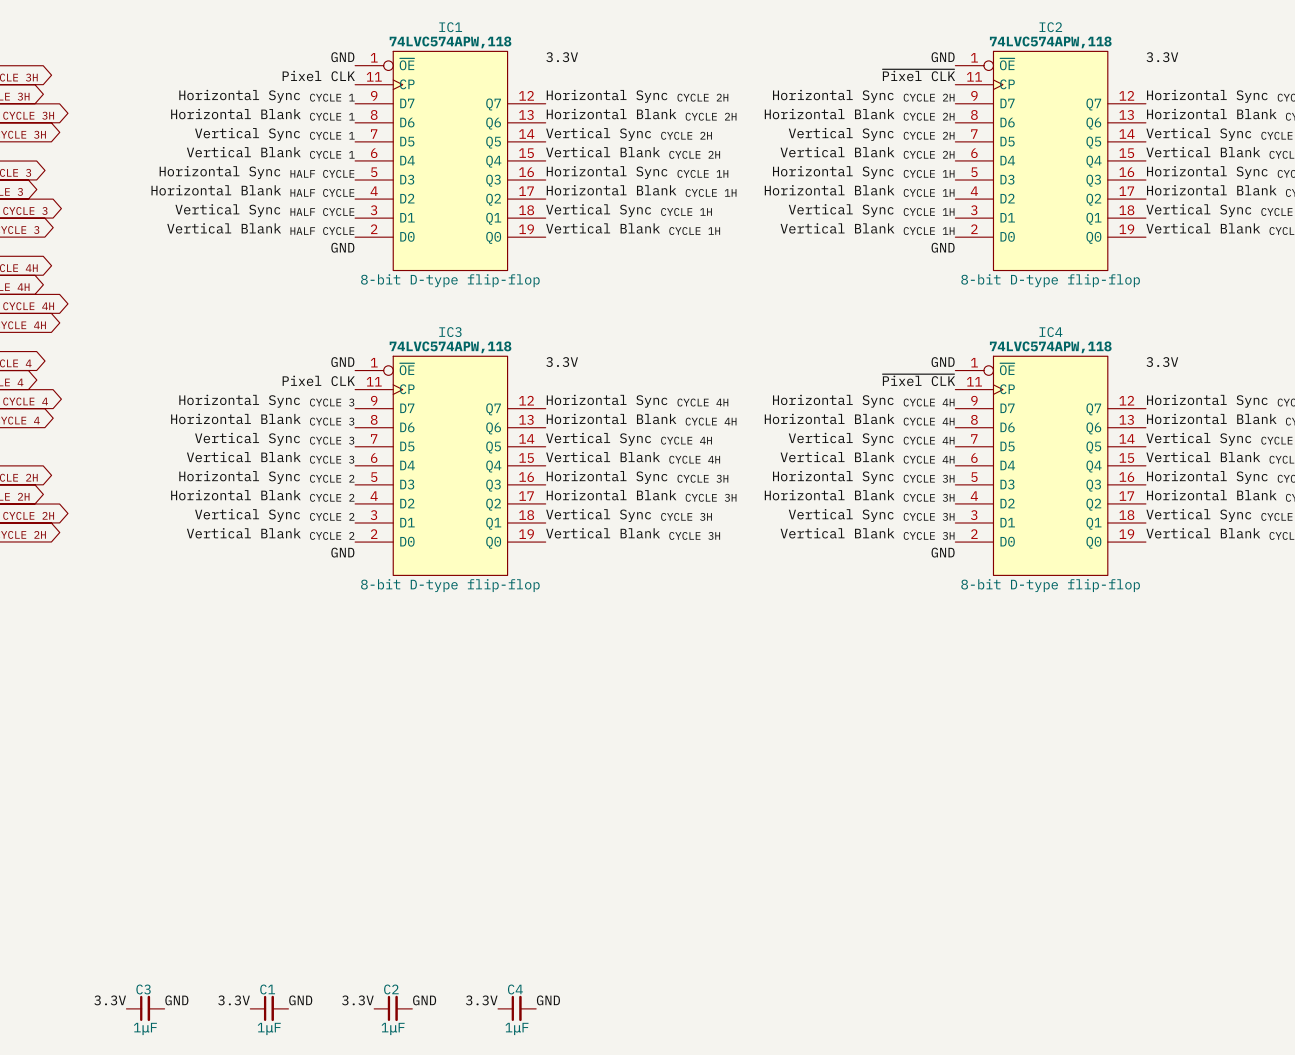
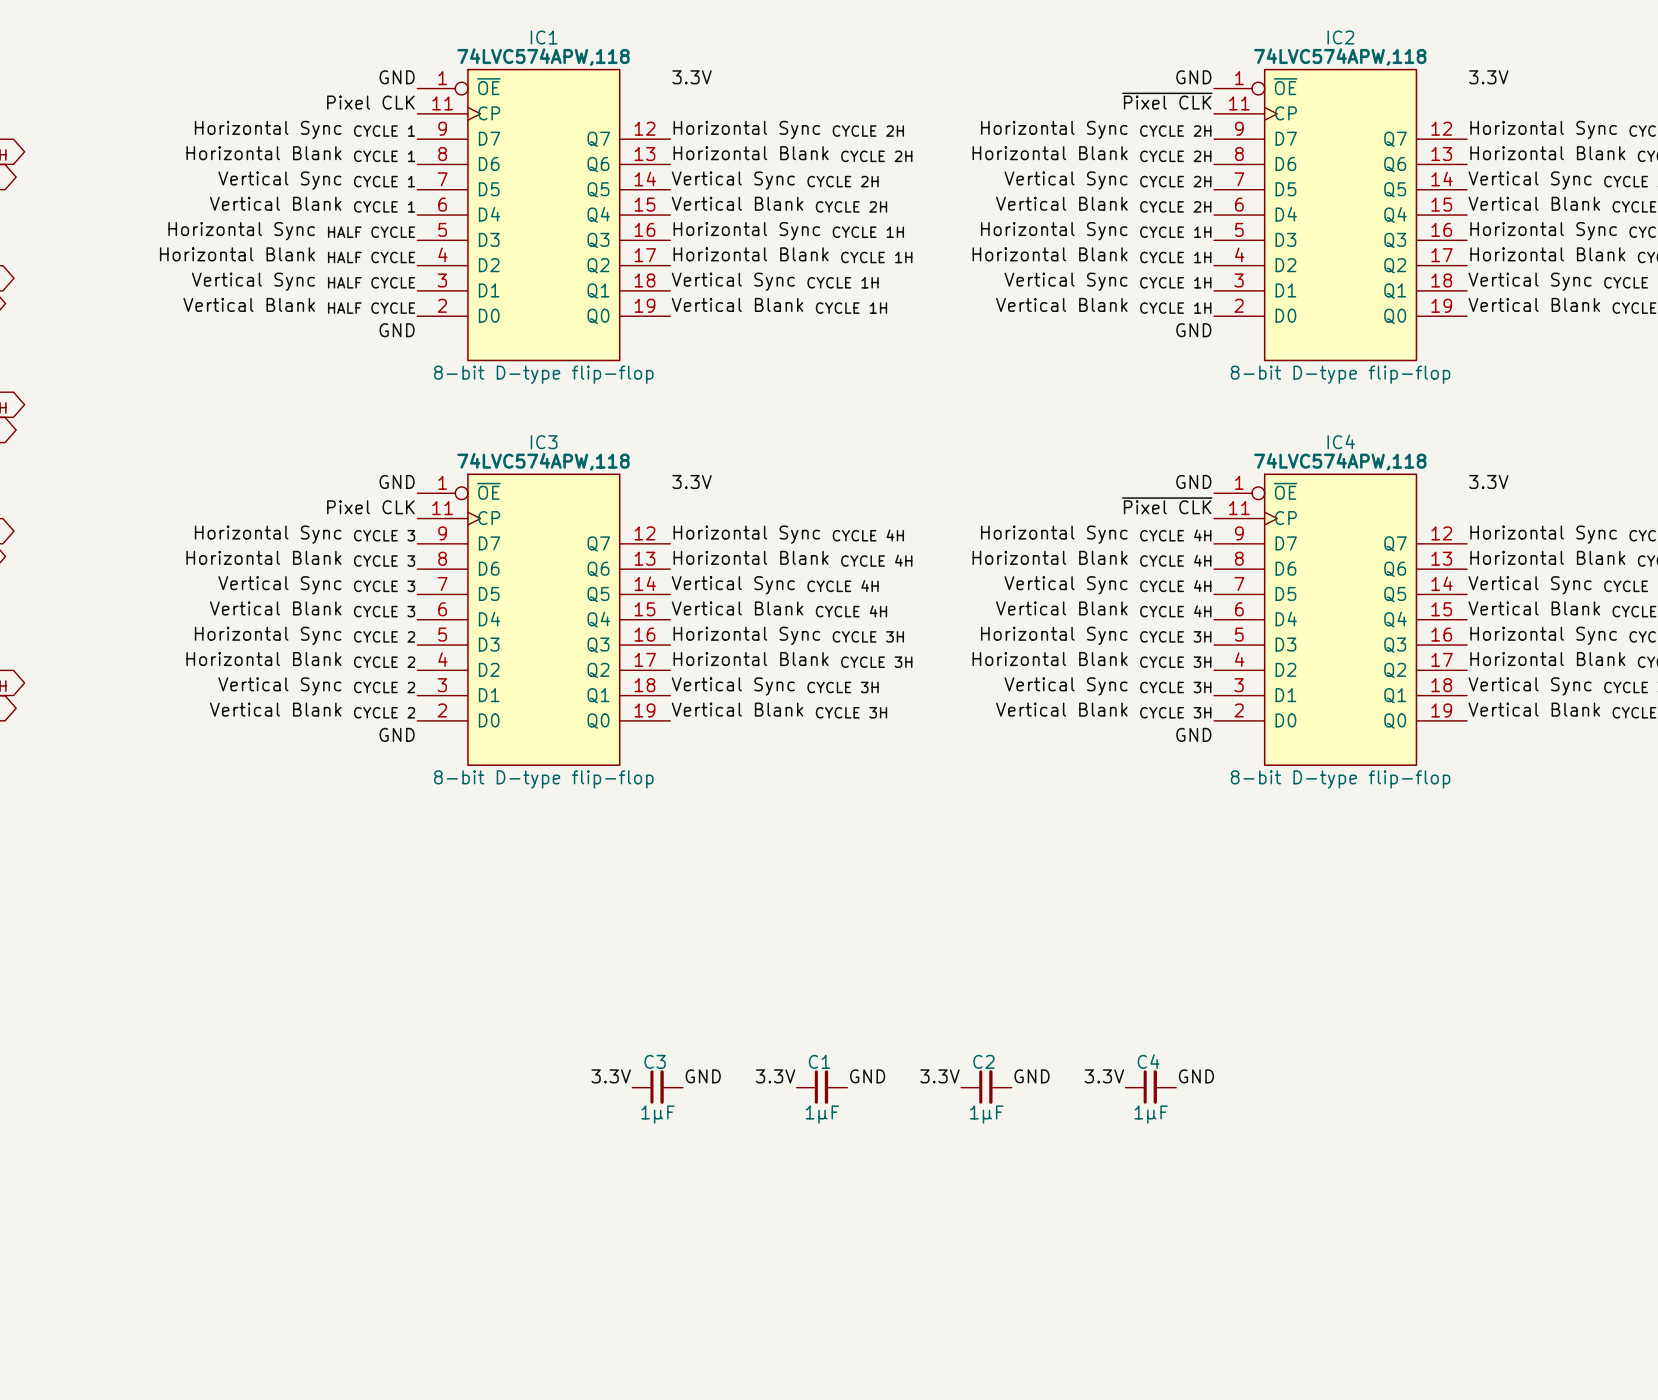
label: none -> 3.3V (611, 1076)
label: none -> GND (703, 1076)
label: none -> 3.3V (775, 1076)
label: none -> GND (867, 1076)
label: none -> 3.3V (939, 1076)
label: none -> GND (1032, 1076)
label: none -> 3.3V (1104, 1076)
label: none -> GND (1196, 1076)
label: 3.3V (110, 1000) -> none
label: GND (176, 1000) -> none
label: 3.3V (234, 1000) -> none
label: GND (300, 1000) -> none
label: 3.3V (357, 1000) -> none
label: GND (424, 1000) -> none
label: 3.3V (481, 1000) -> none
label: GND (548, 1000) -> none
C3 position: (145, 1008) -> (657, 1087)
C1 position: (269, 1008) -> (822, 1087)
C2 position: (393, 1008) -> (986, 1087)
C4 position: (517, 1008) -> (1150, 1087)

